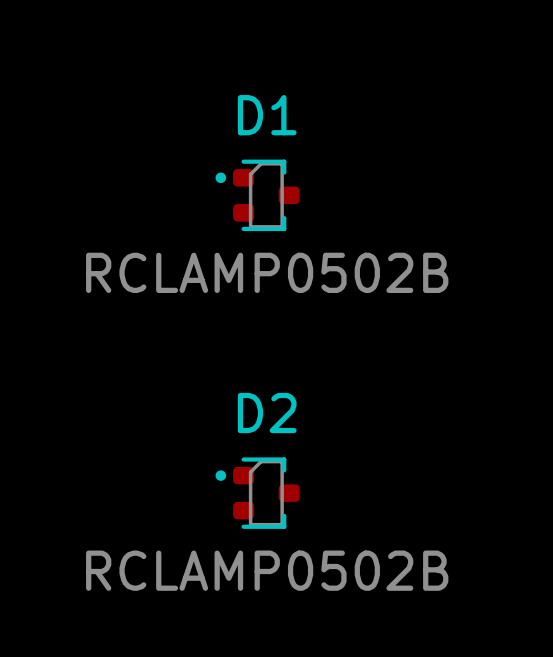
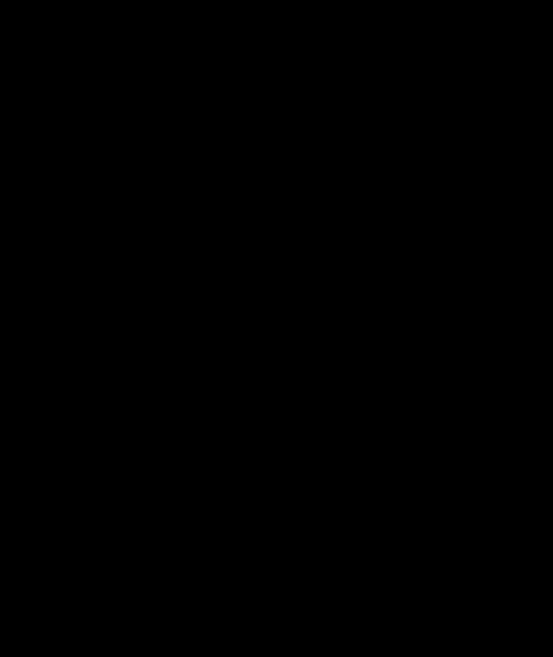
D1: RCLAMP0502B (257, 195) -> none
D2: RCLAMP0502B (257, 493) -> none

